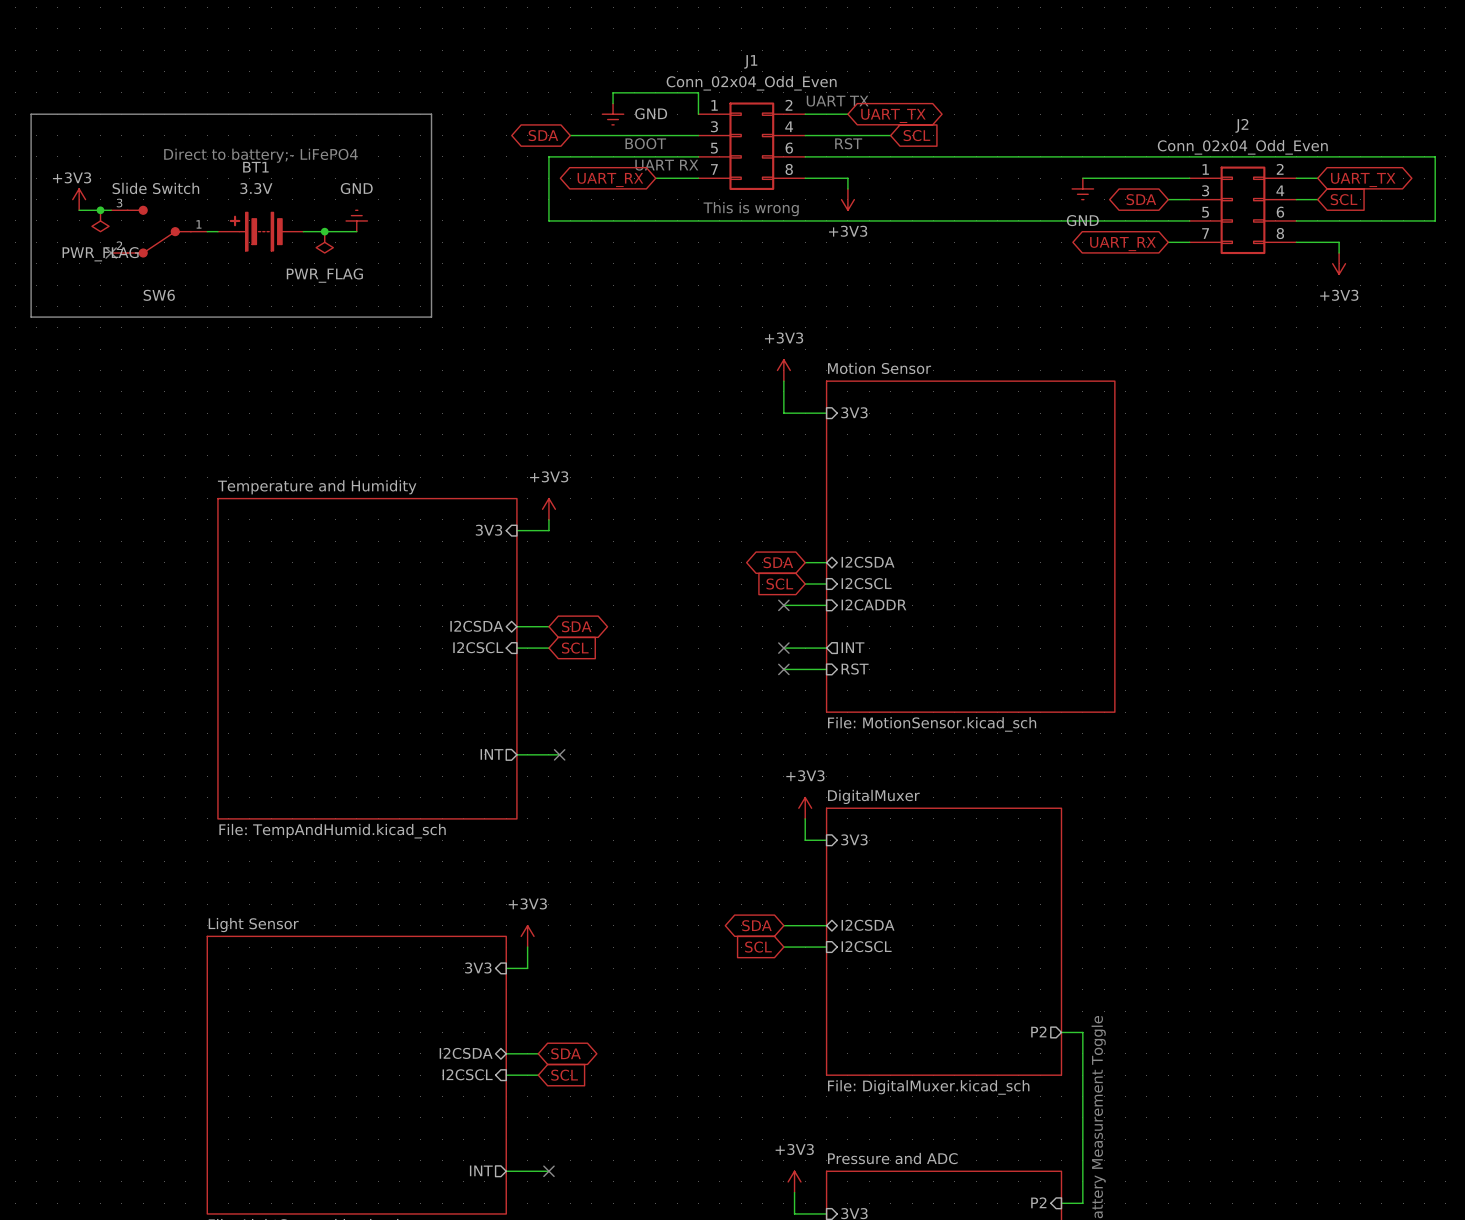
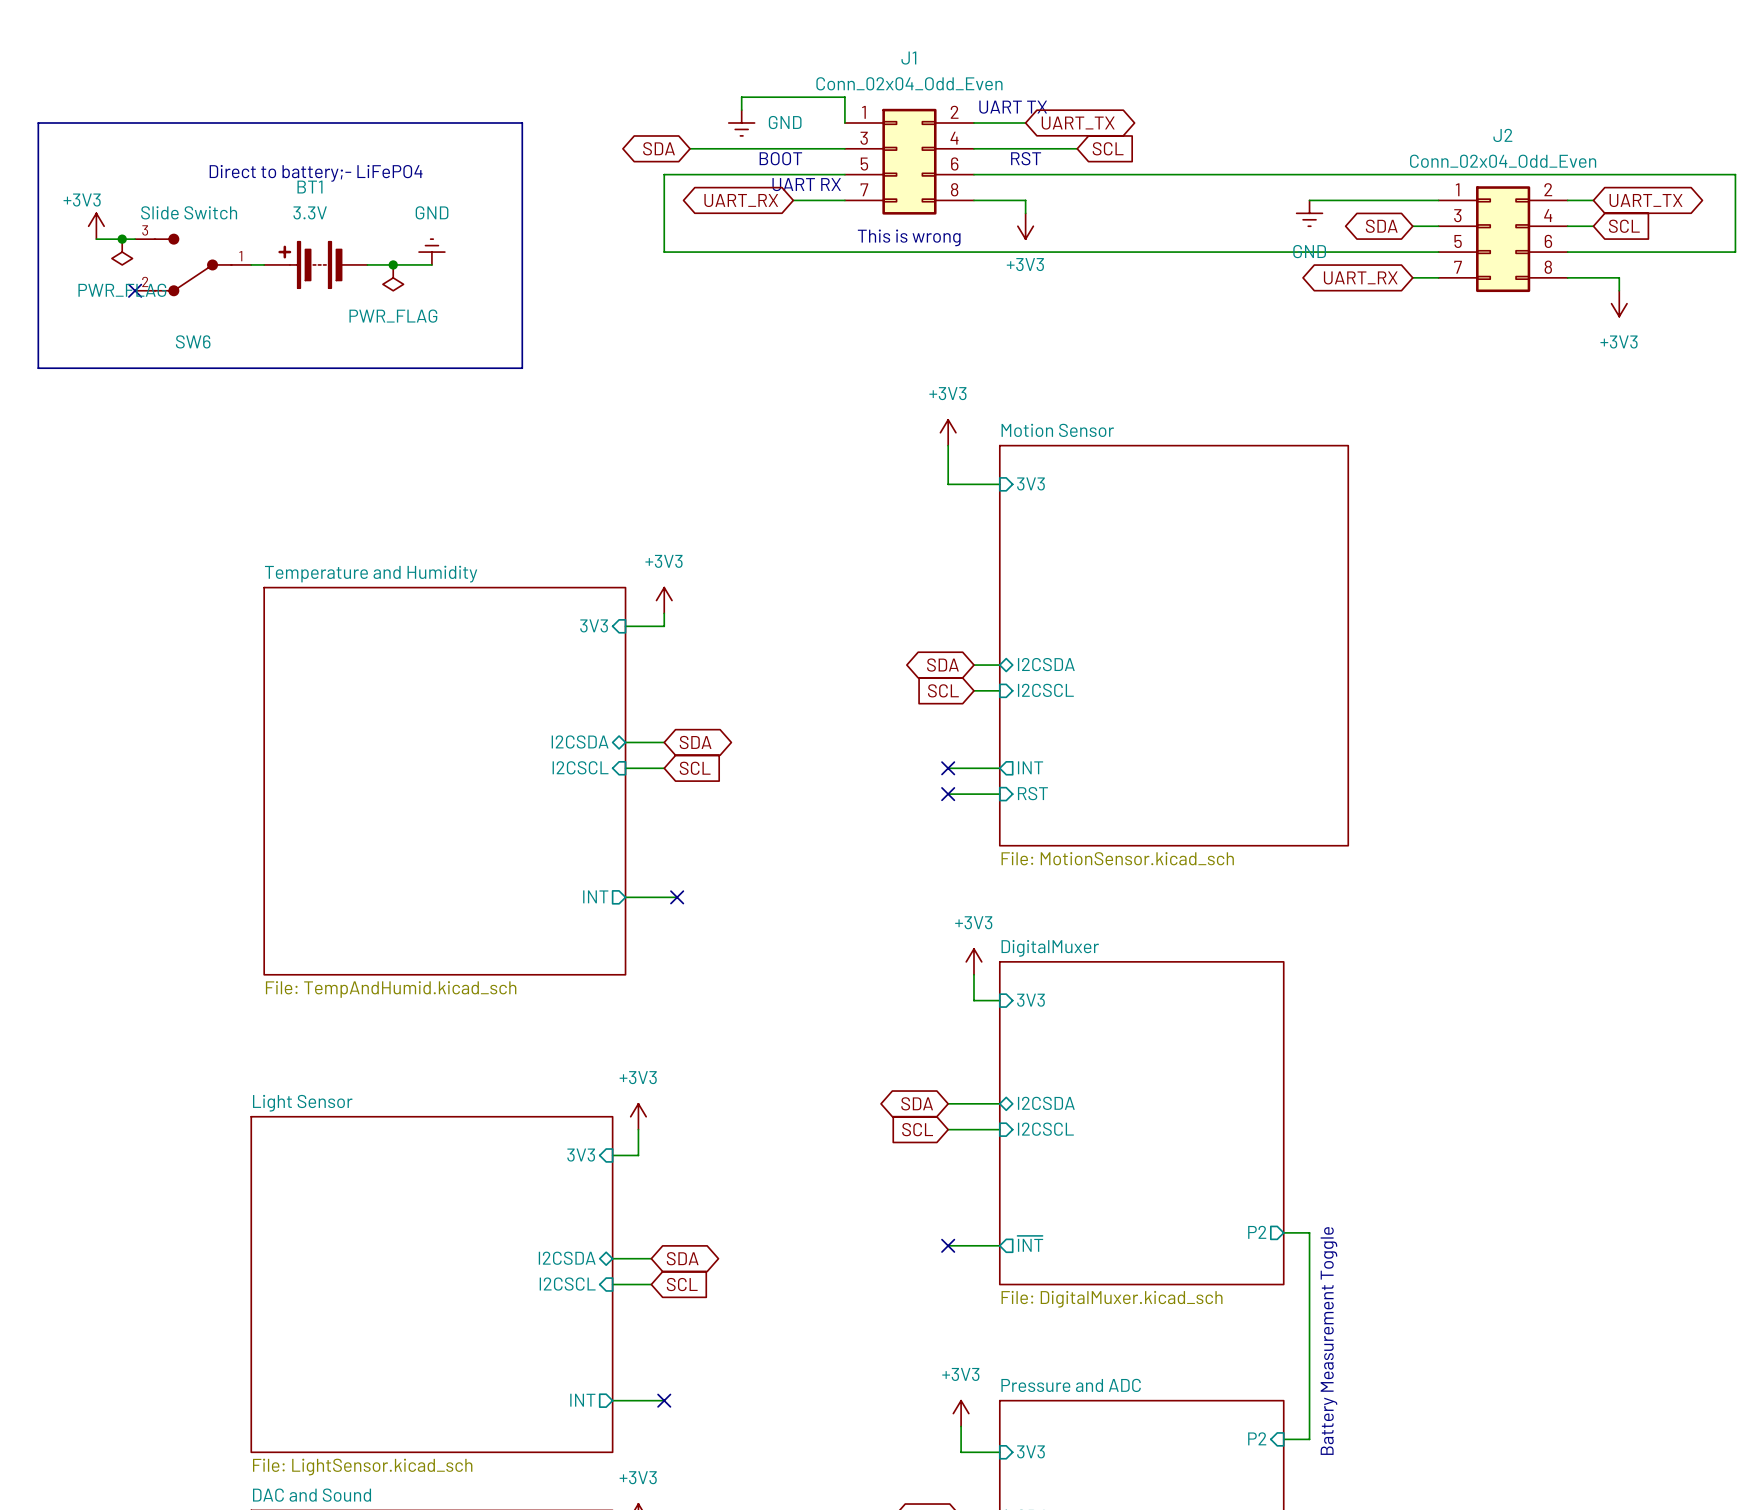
sheet pin: I2CADDR (873, 604) -> none
wire: (783, 605) (826, 605) -> none
no-connect mark: (783, 605) -> none
sheet pin: none -> ~{INT} (1030, 1243)
wire: none -> (948, 1245) (999, 1245)
no-connect mark: none -> (948, 1245)

